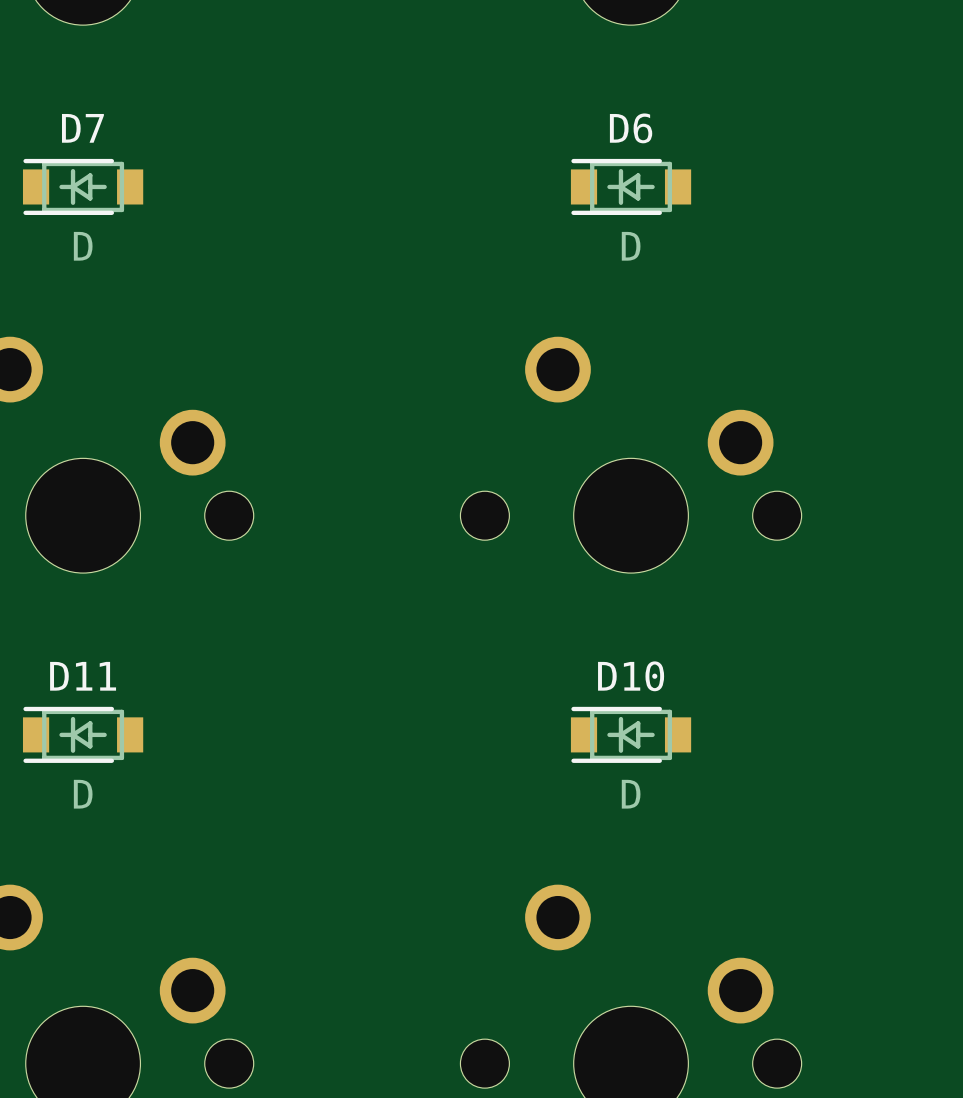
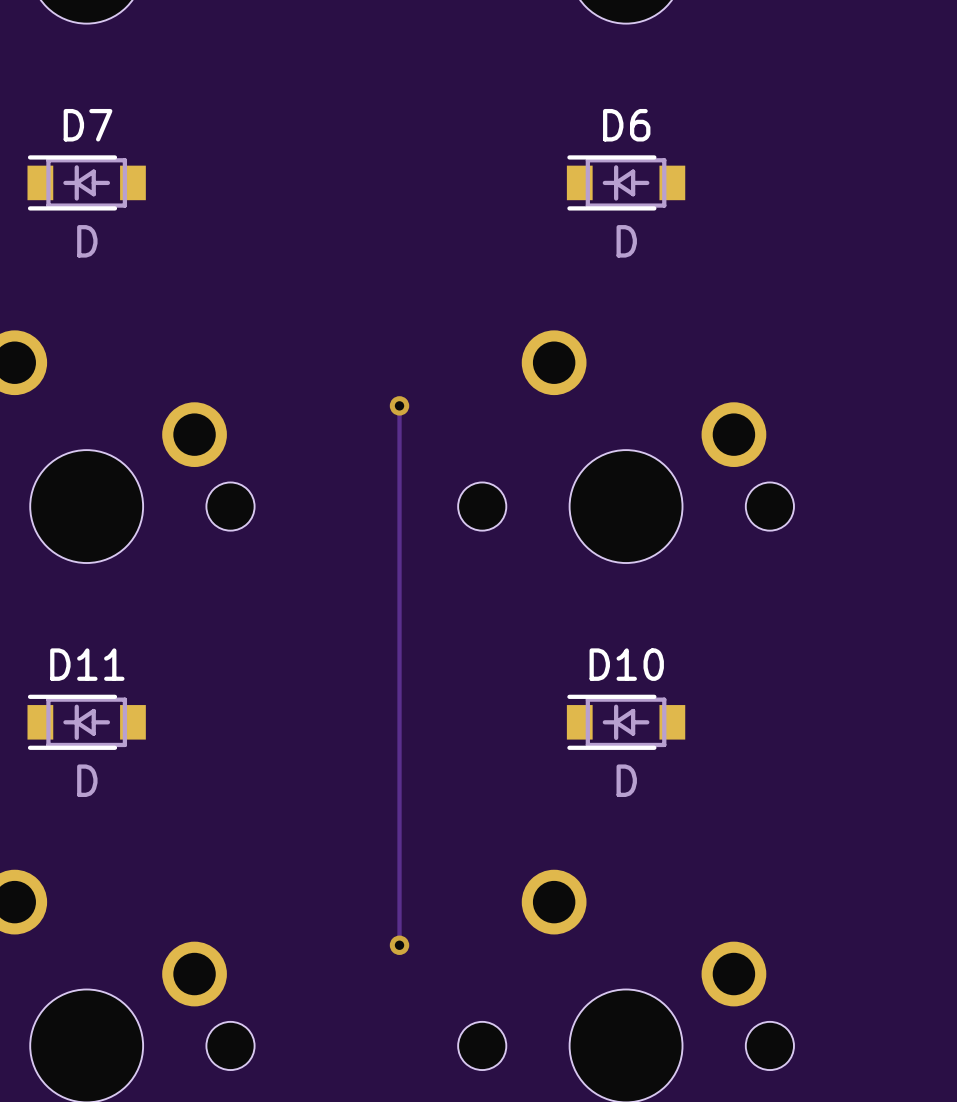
track: none -> (399, 405) (399, 945)
via: none -> (399, 405)
via: none -> (399, 945)

